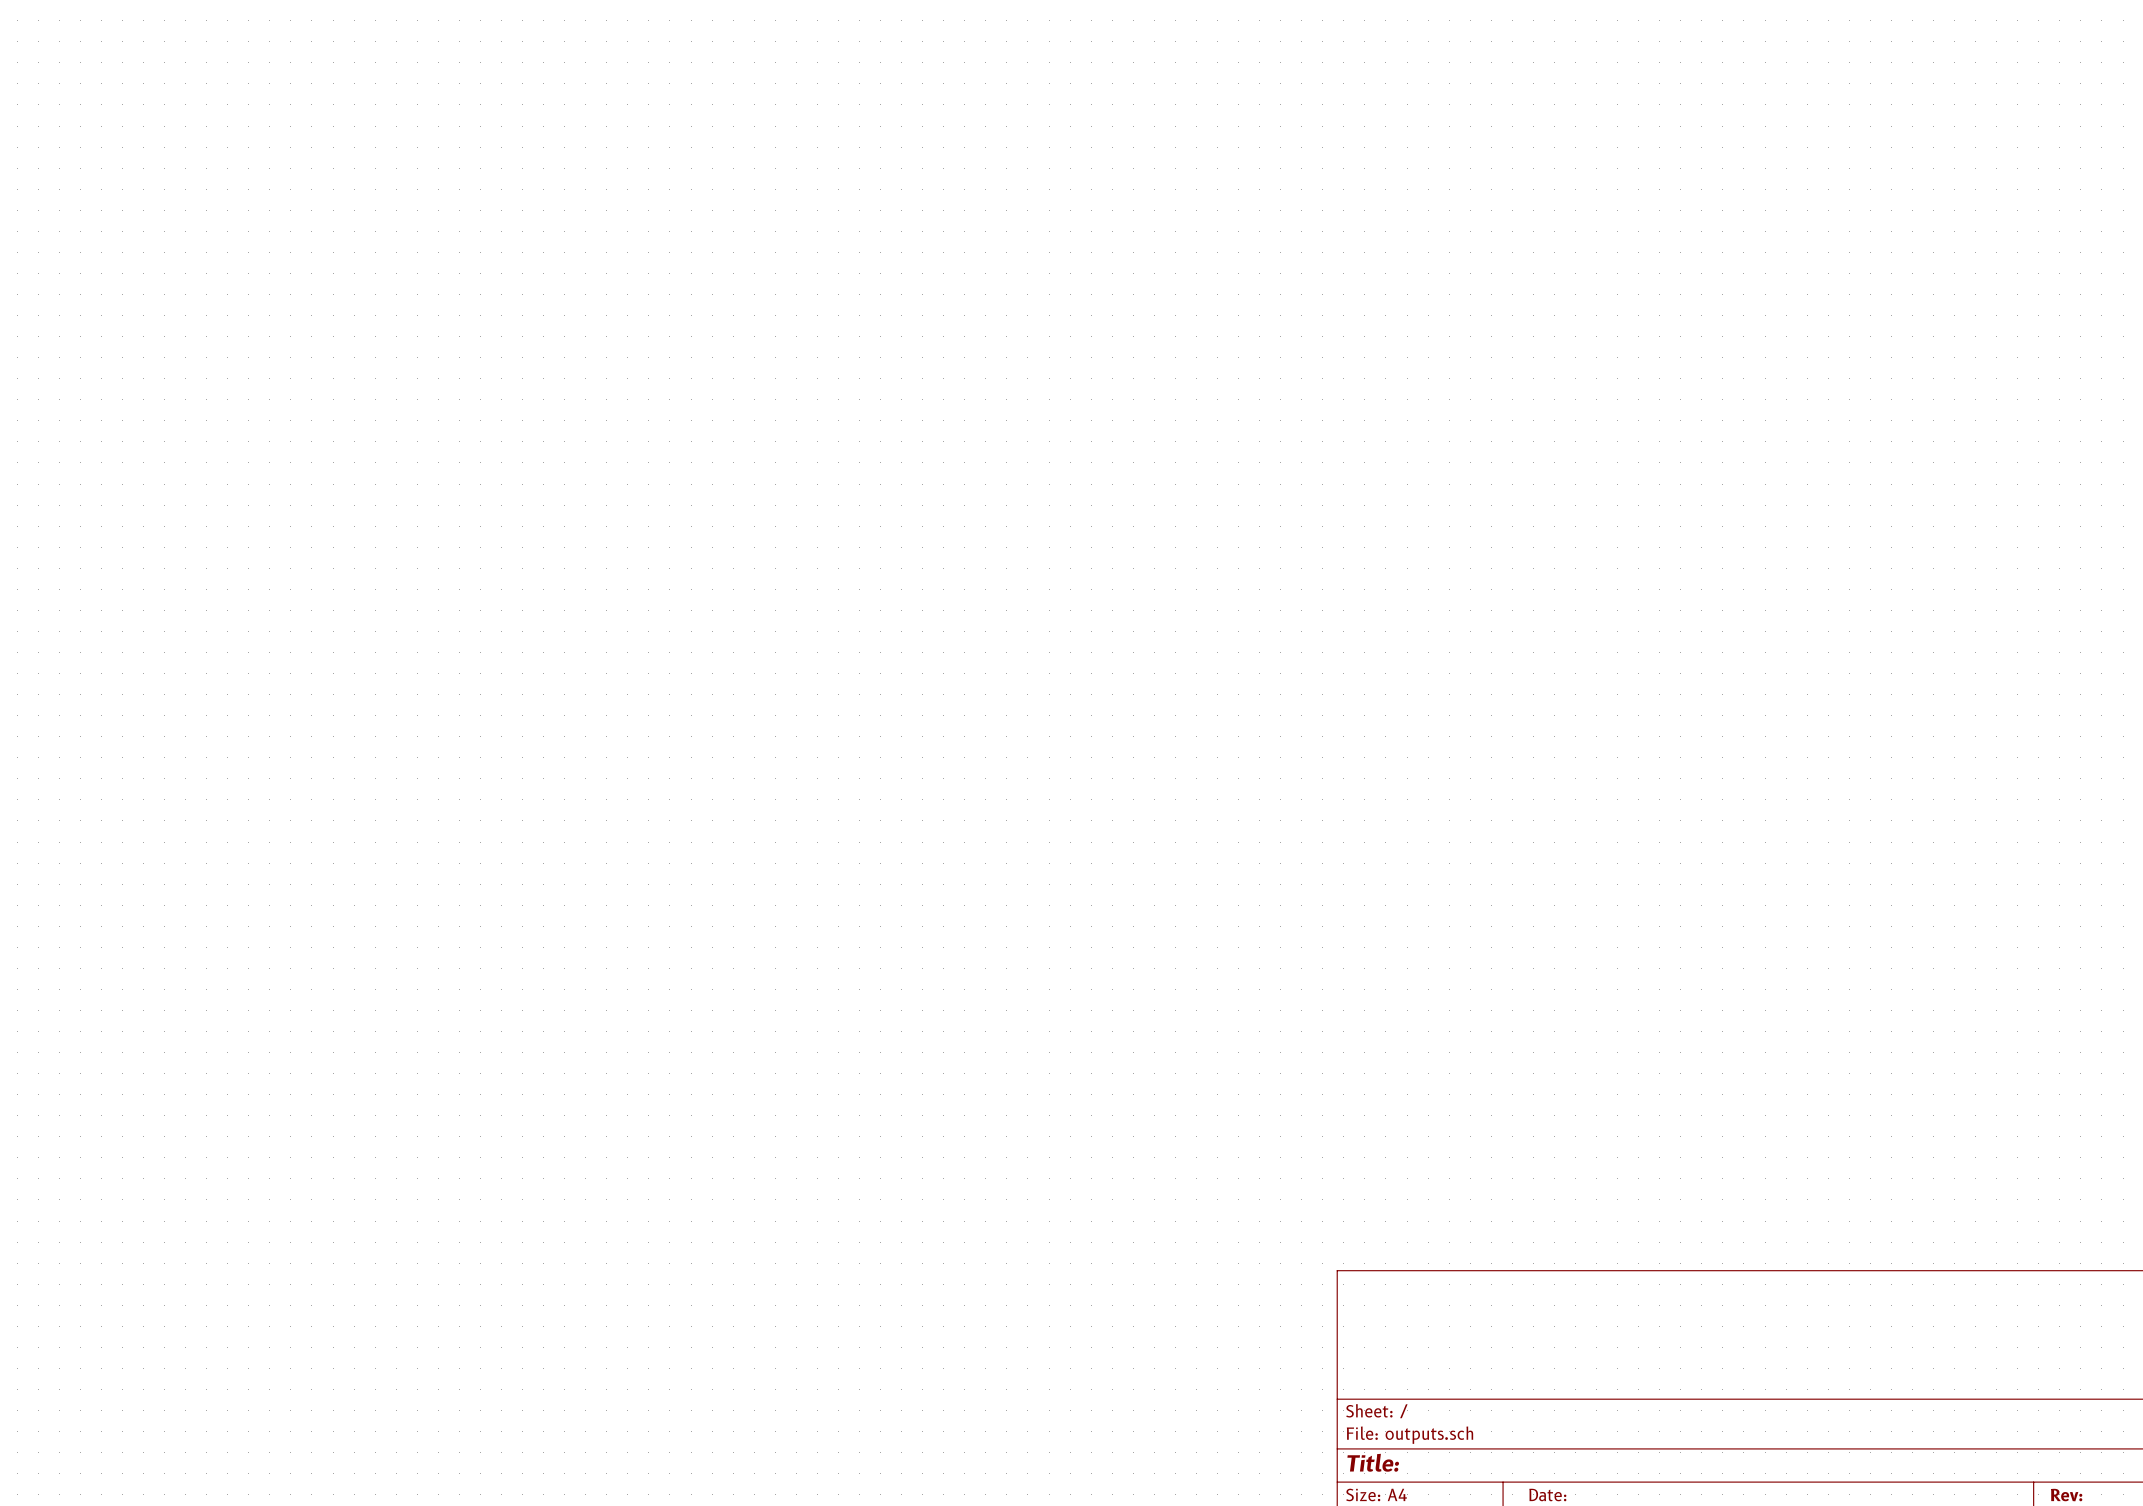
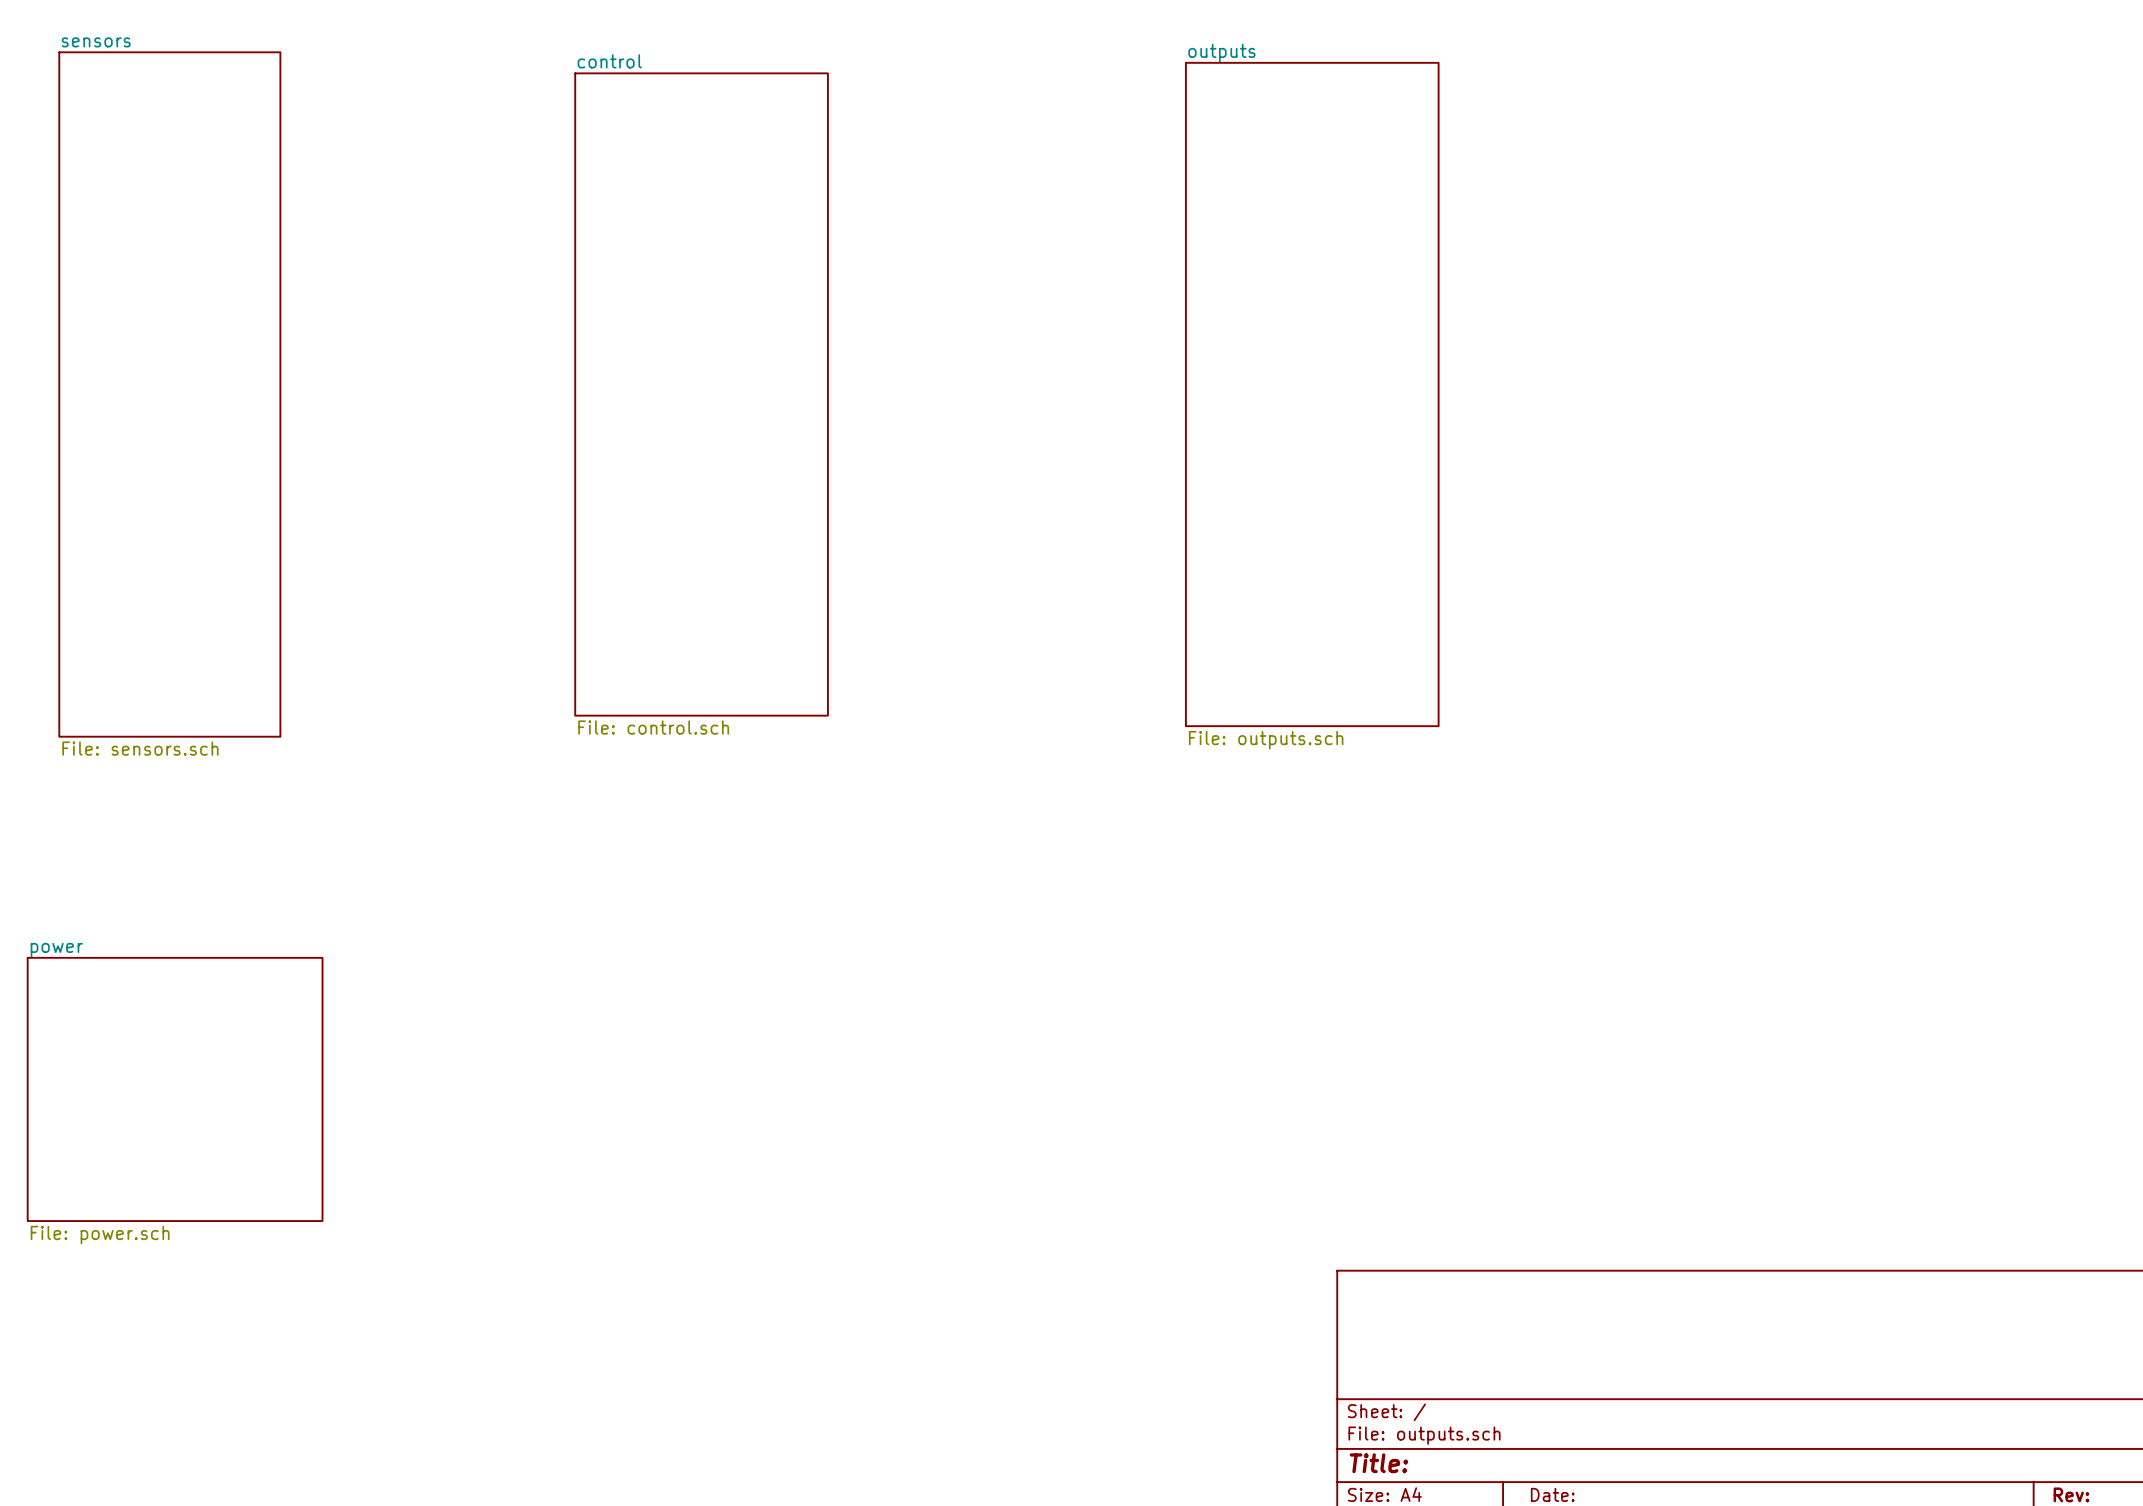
sheet sensors: none -> File: sensors.sch (169, 394)
sheet control: none -> File: control.sch (701, 394)
sheet outputs: none -> File: outputs.sch (1312, 394)
sheet power: none -> File: power.sch (175, 1089)

